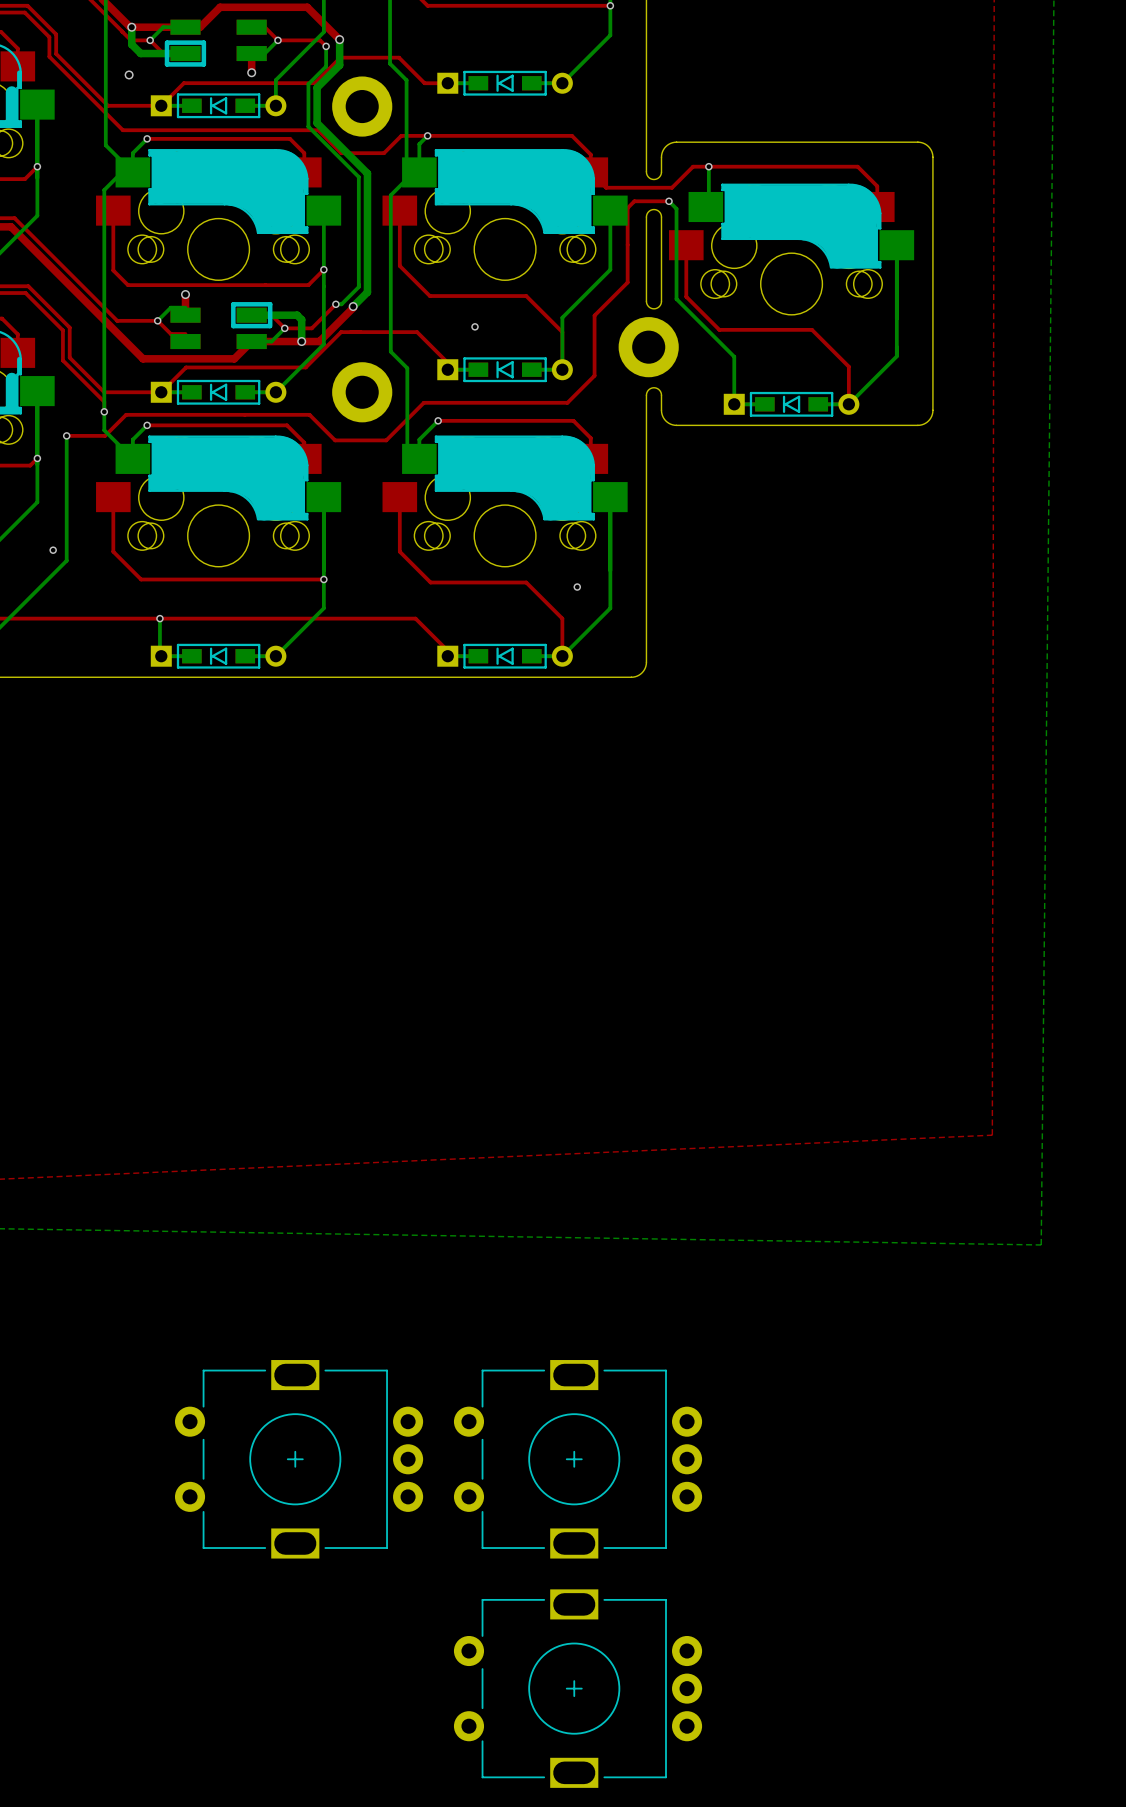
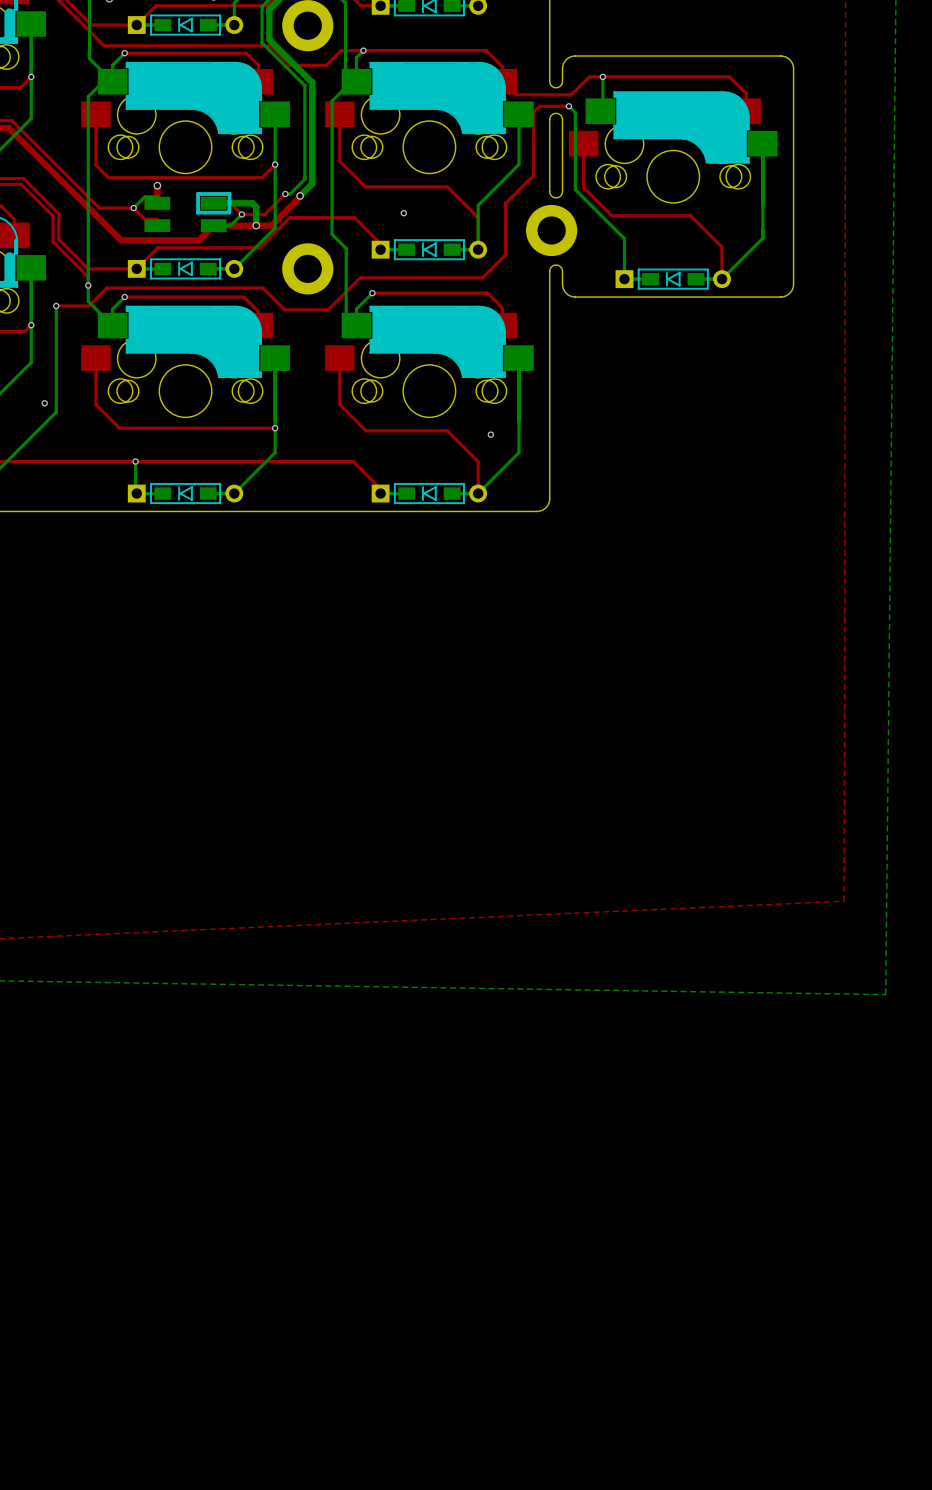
part: (299, 1459) -> none
part: (578, 1459) -> none
part: (578, 1688) -> none

